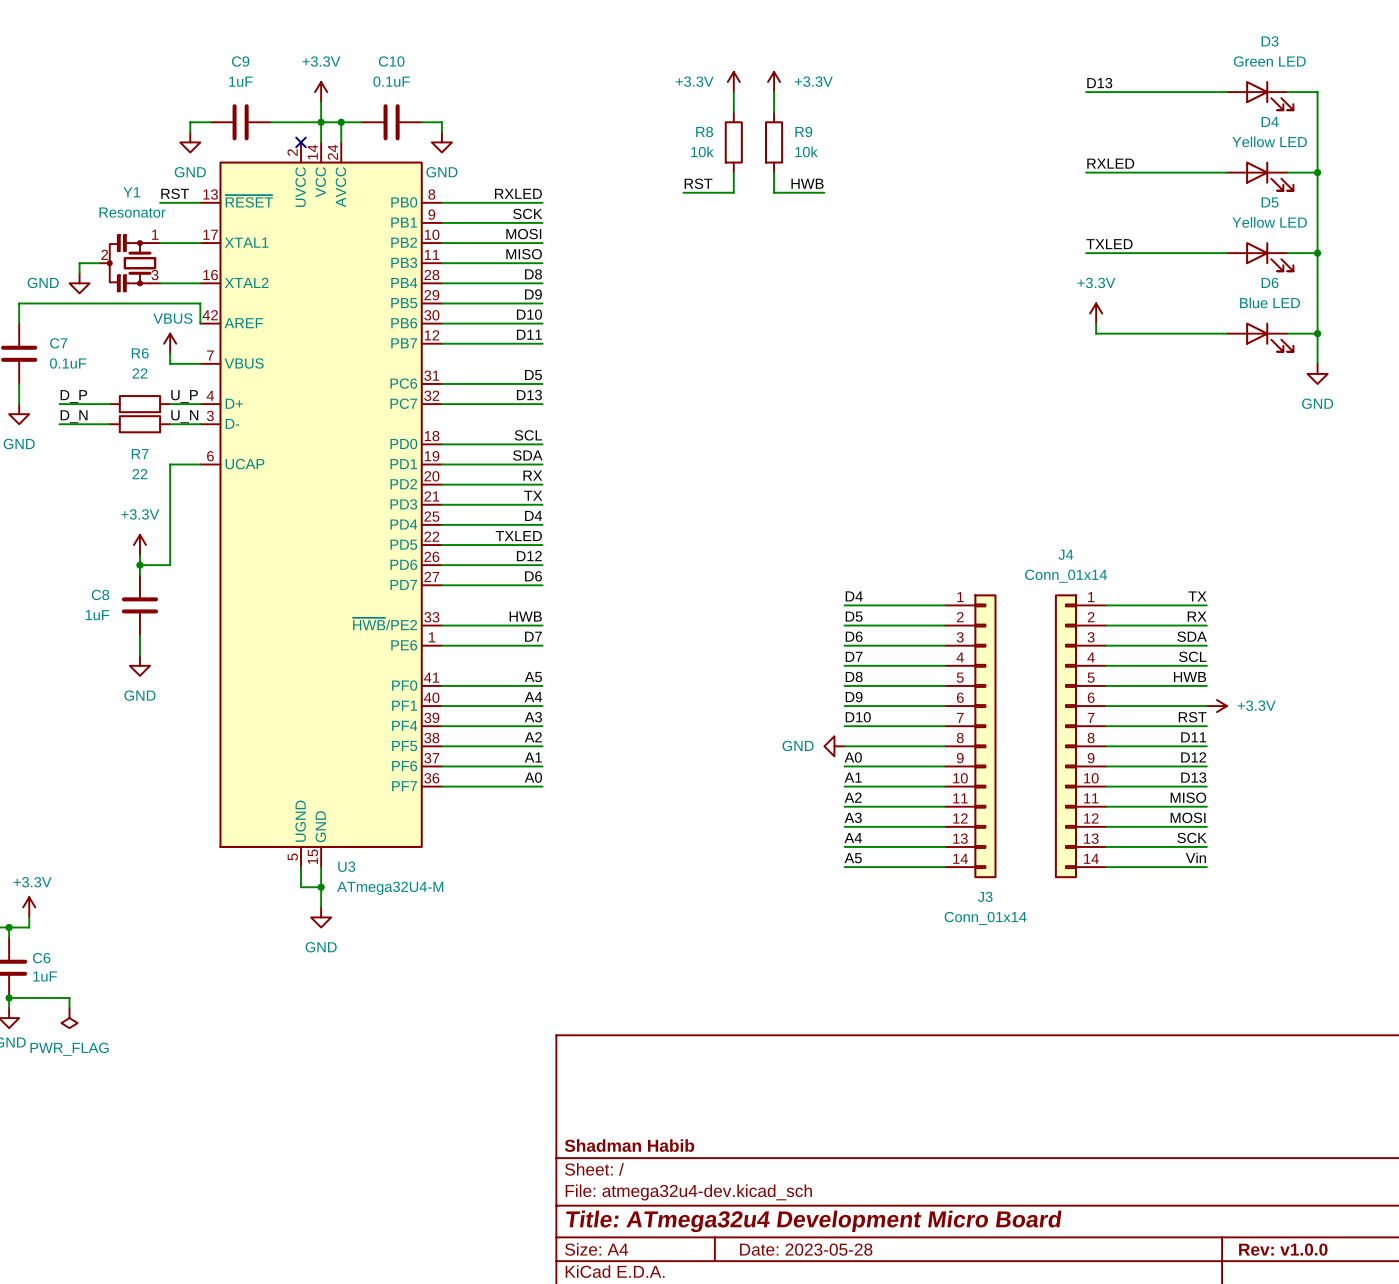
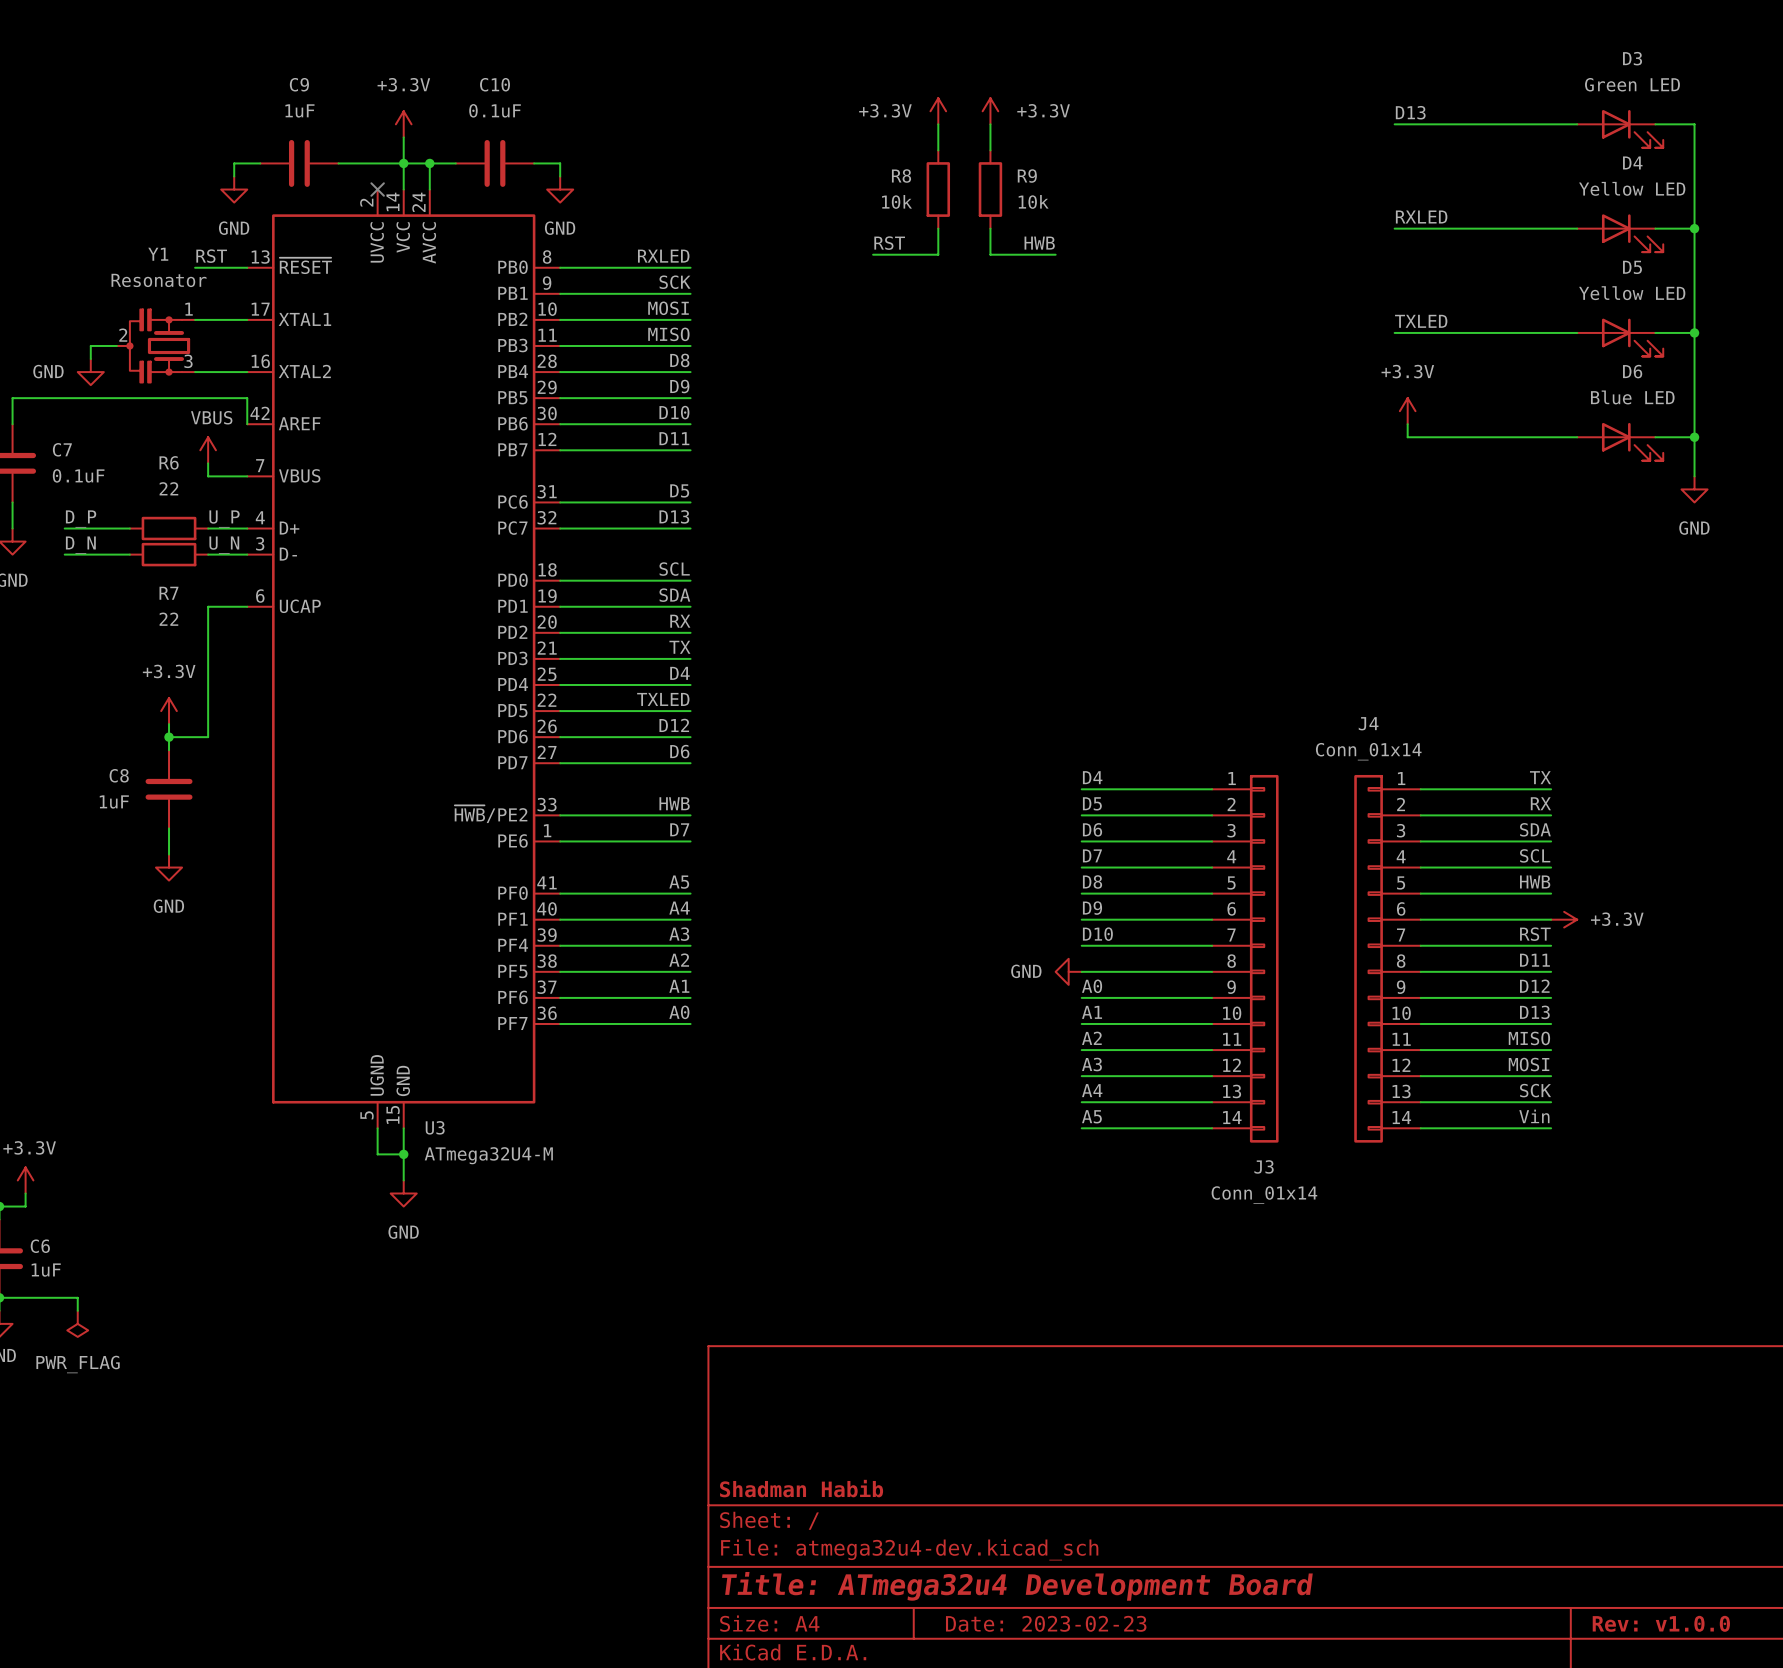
title block: Title: ATmega32u4 Development Micro Board (813, 1221) -> Title: ATmega32u4 Development Board (1017, 1586)
title block: Date: 2023-05-28 (806, 1249) -> Date: 2023-02-23 (1046, 1623)

